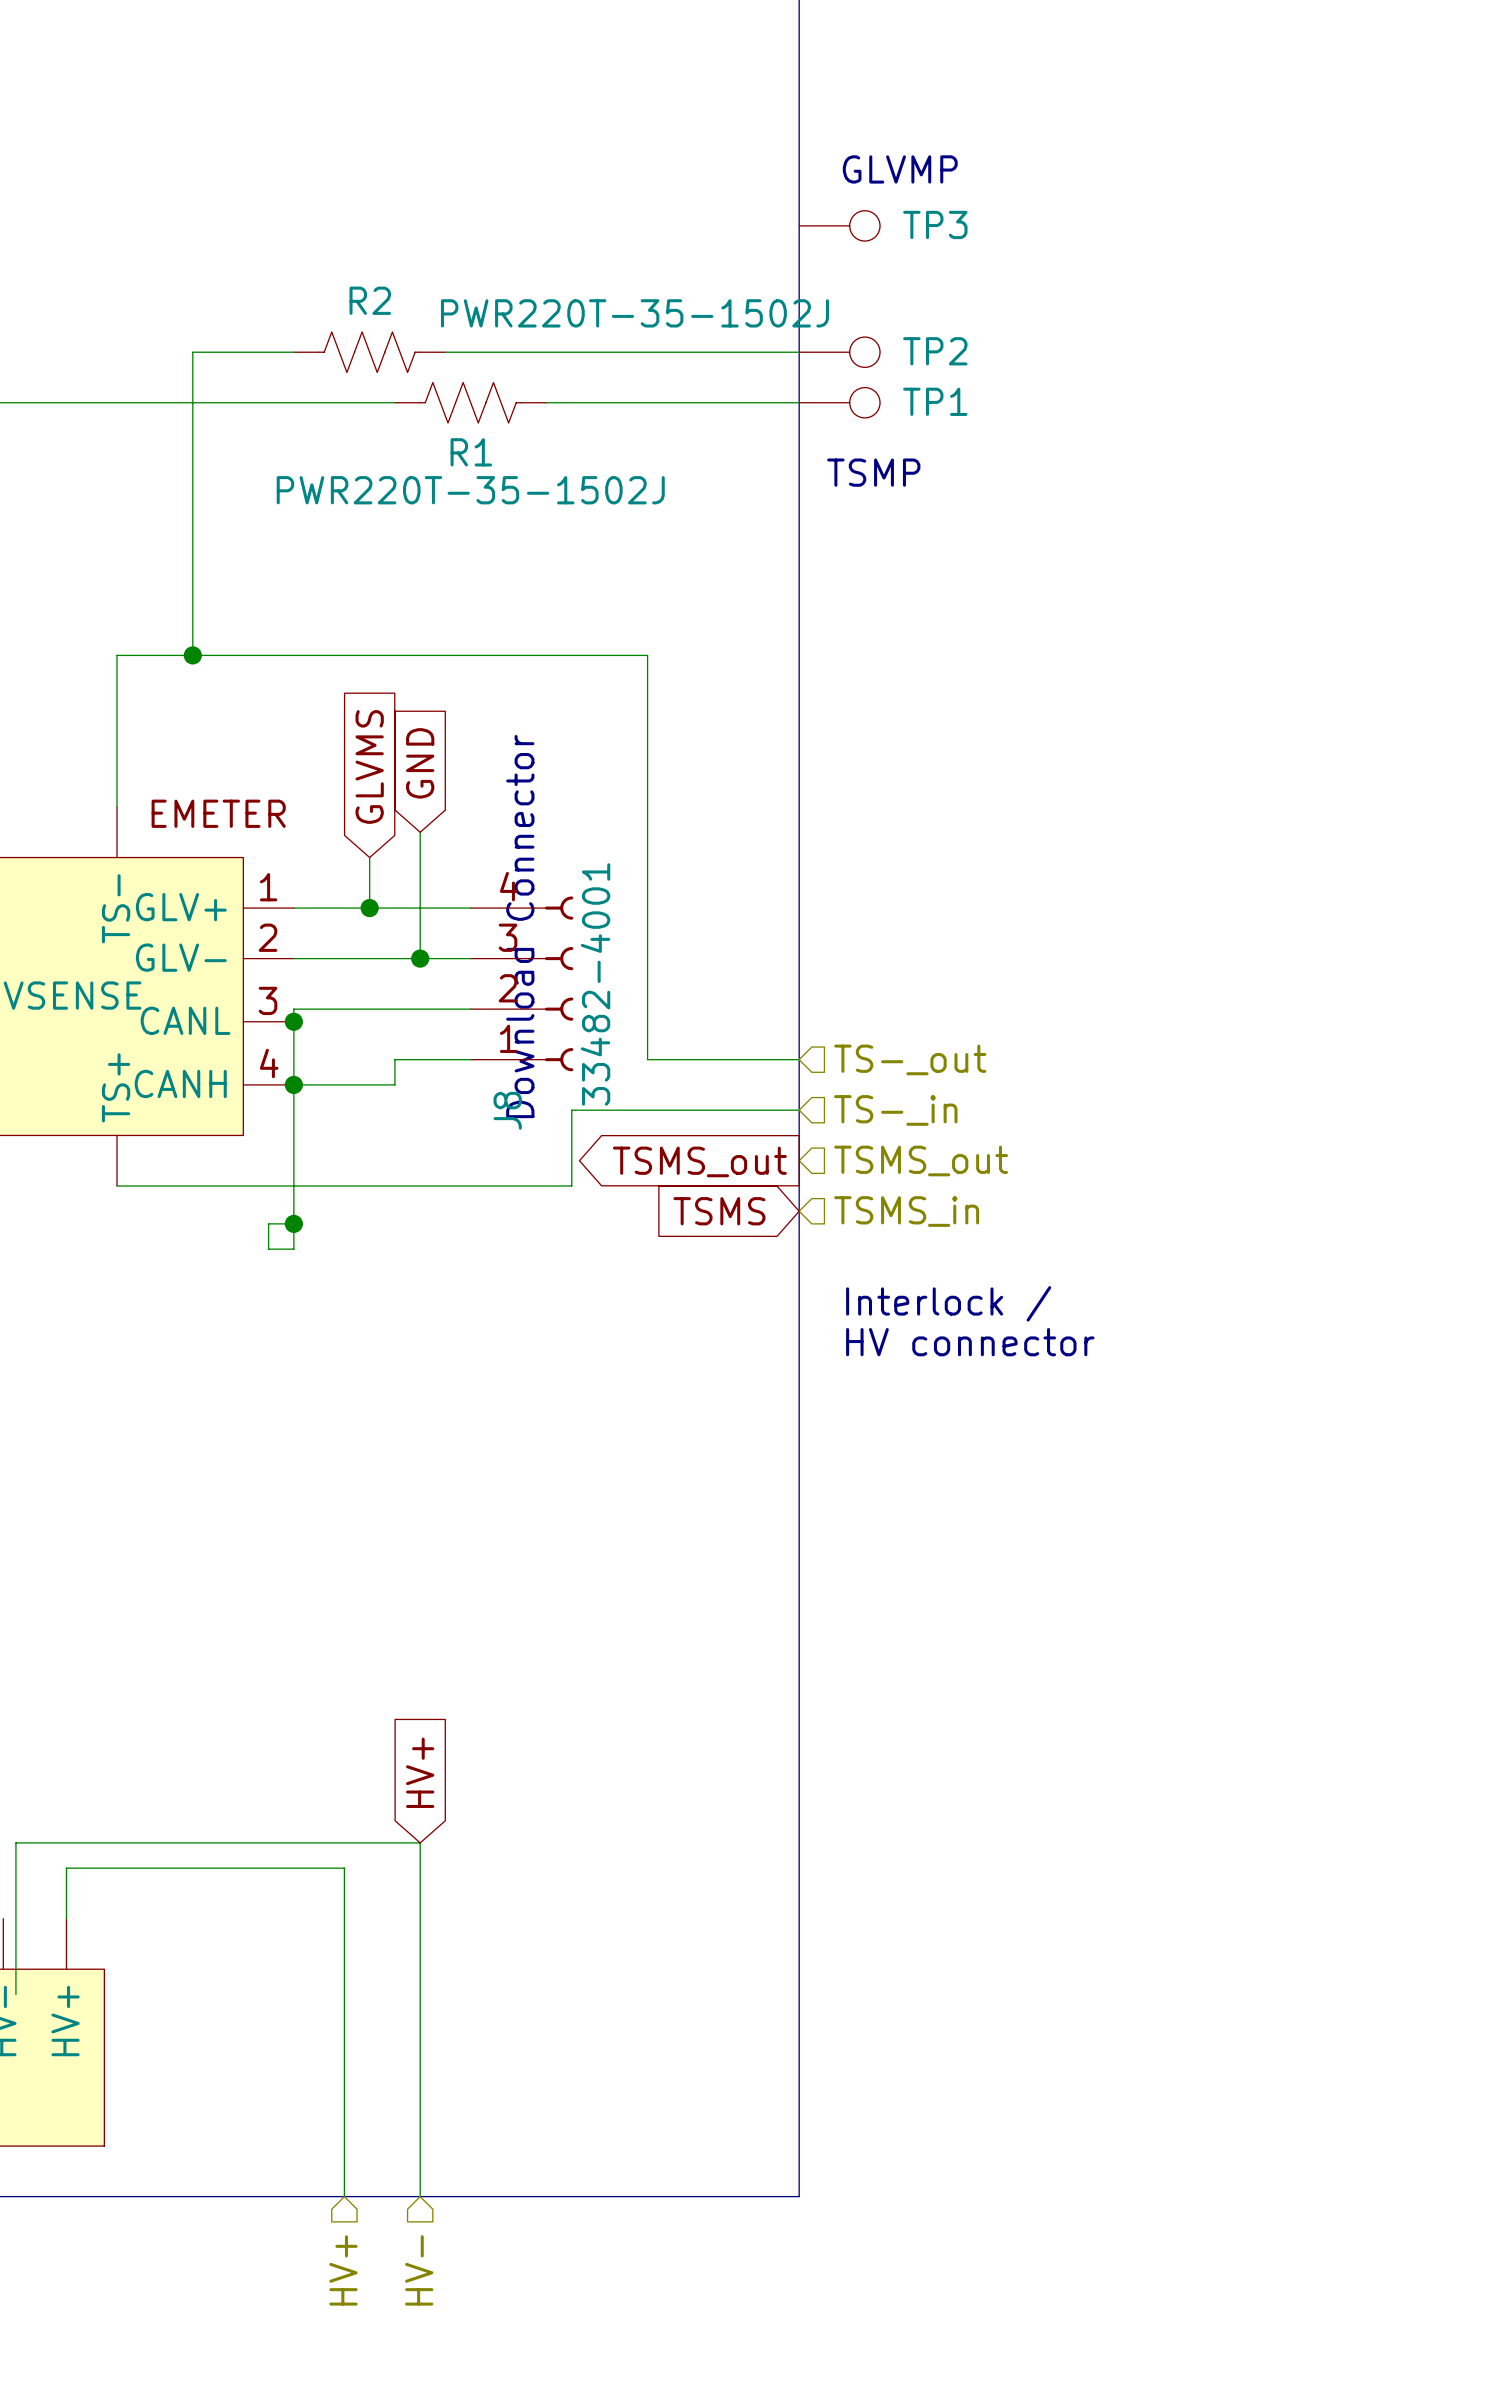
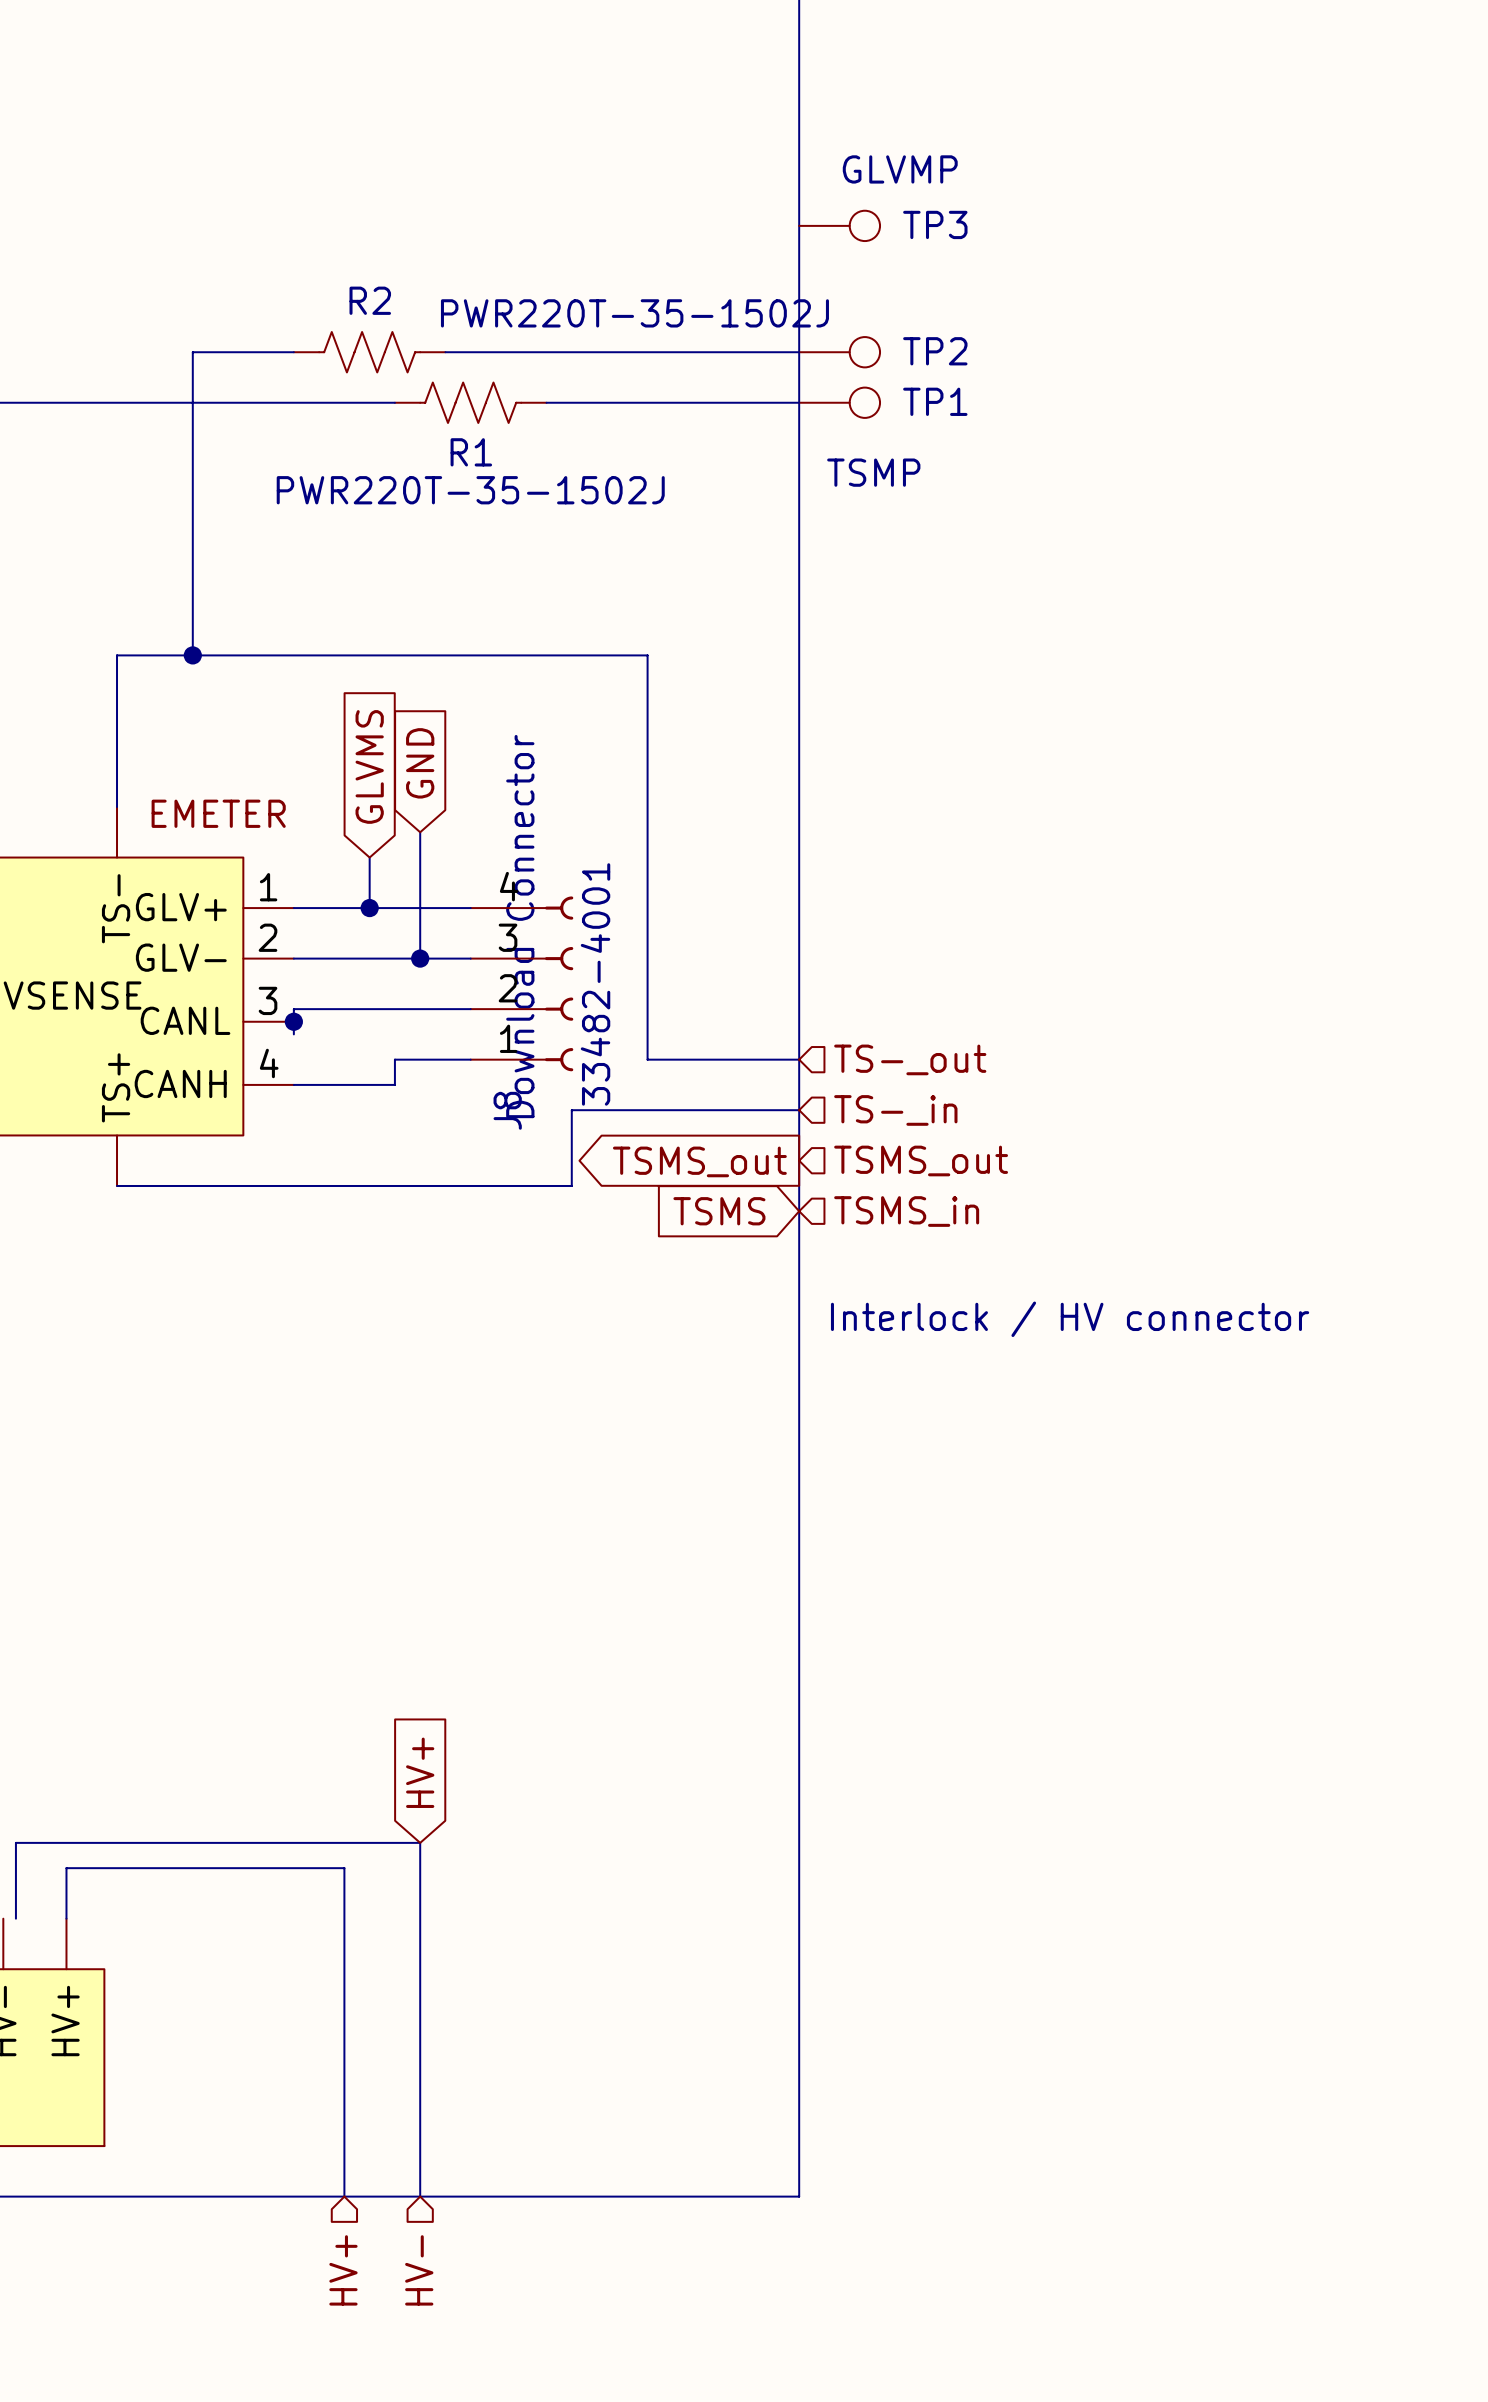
wire: (293, 1034) (293, 1249) (268, 1249) (268, 1223) (293, 1223) -> none
junction: (293, 1084) -> none
junction: (293, 1223) -> none
text: Interlock / (948, 1303) -> none
text: none -> Interlock / HV connector (1070, 1319)
text: HV connector (970, 1342) -> none
wire: (15, 1918) (15, 1994) -> none

